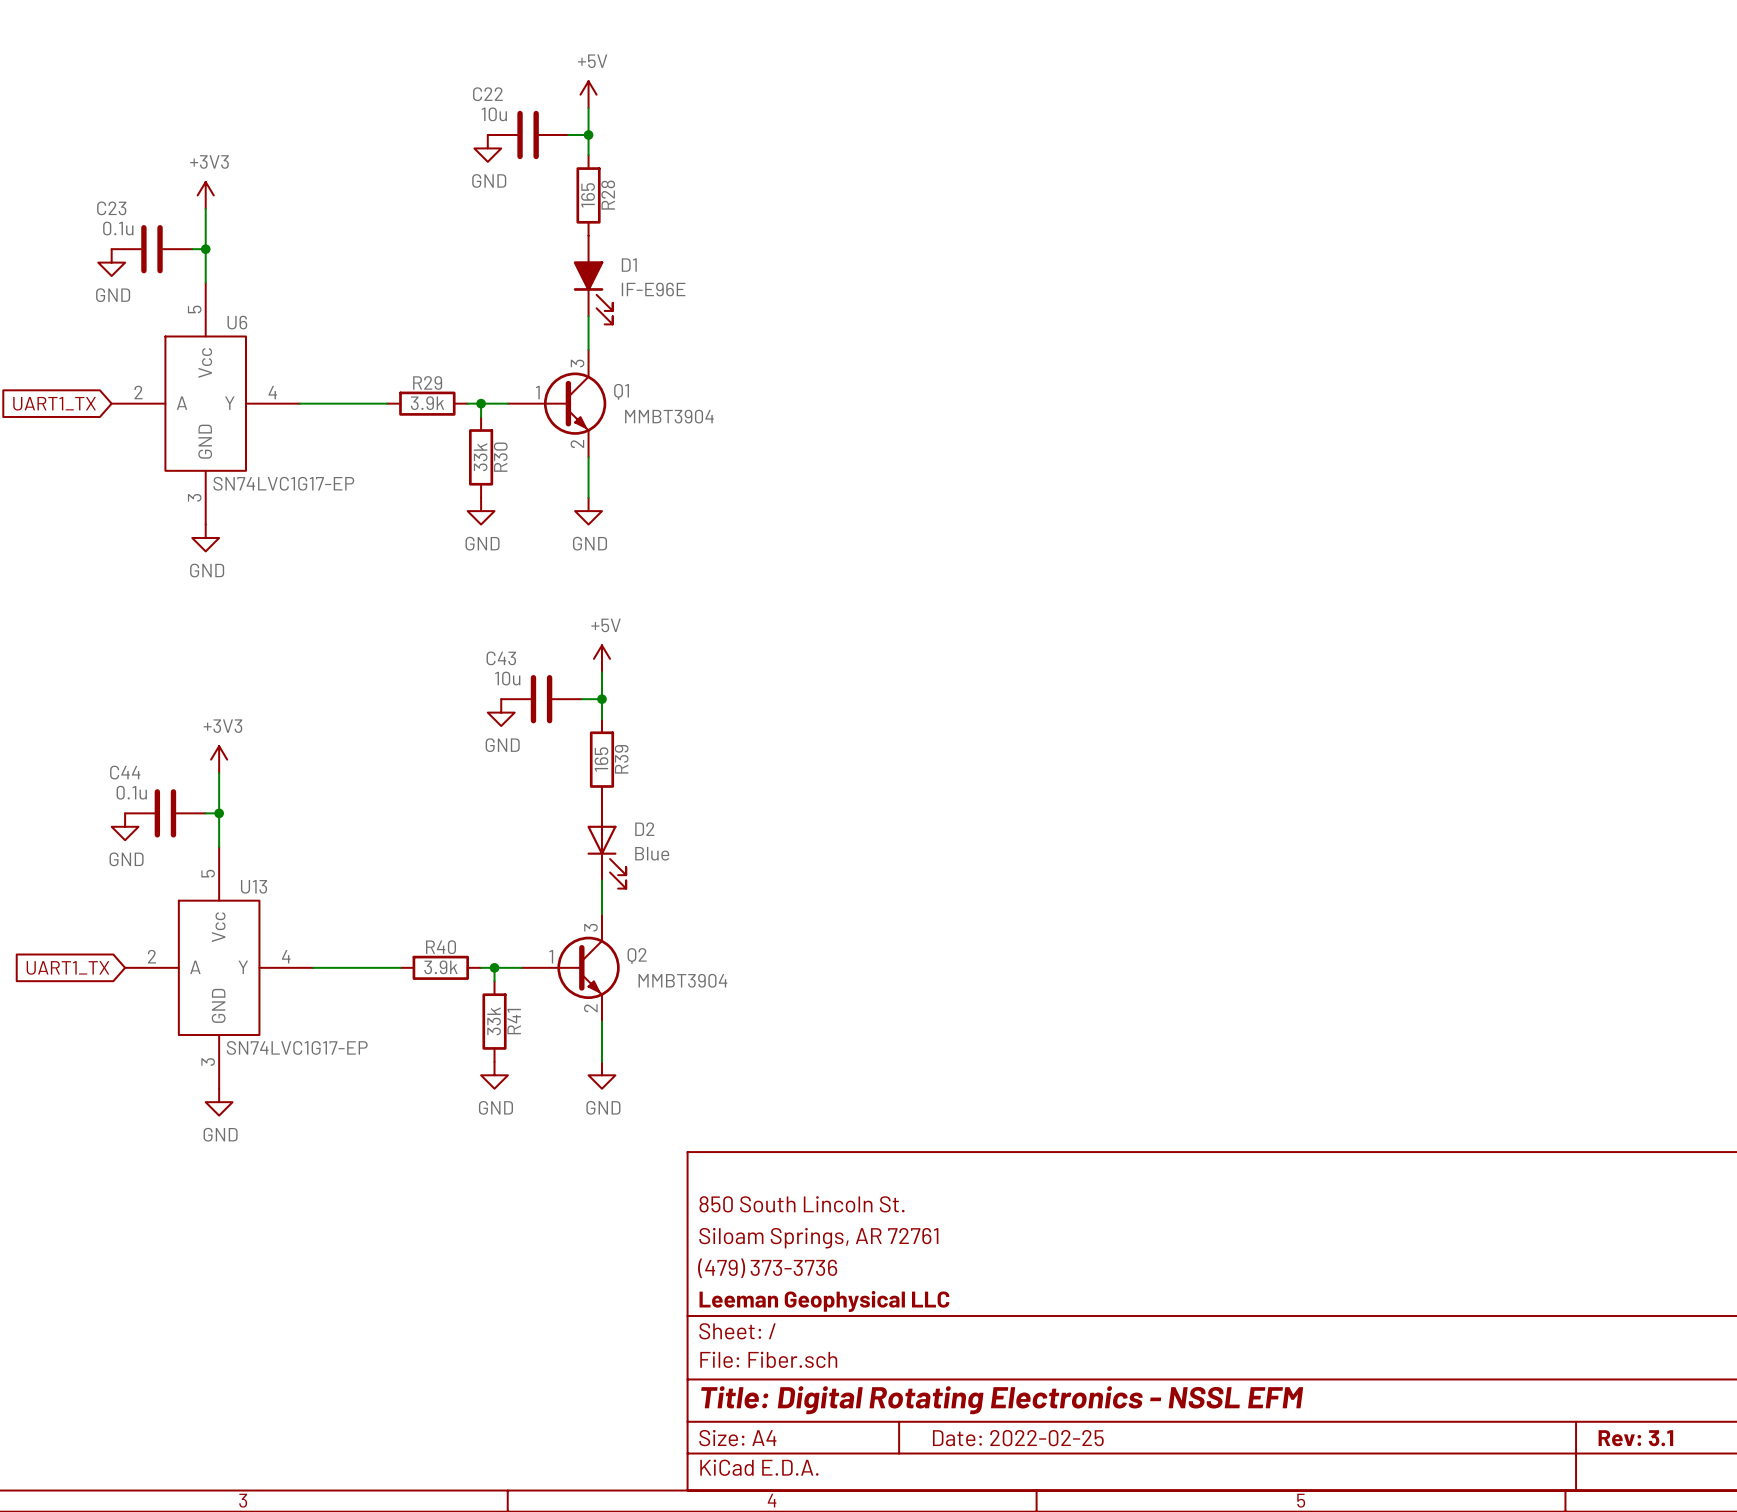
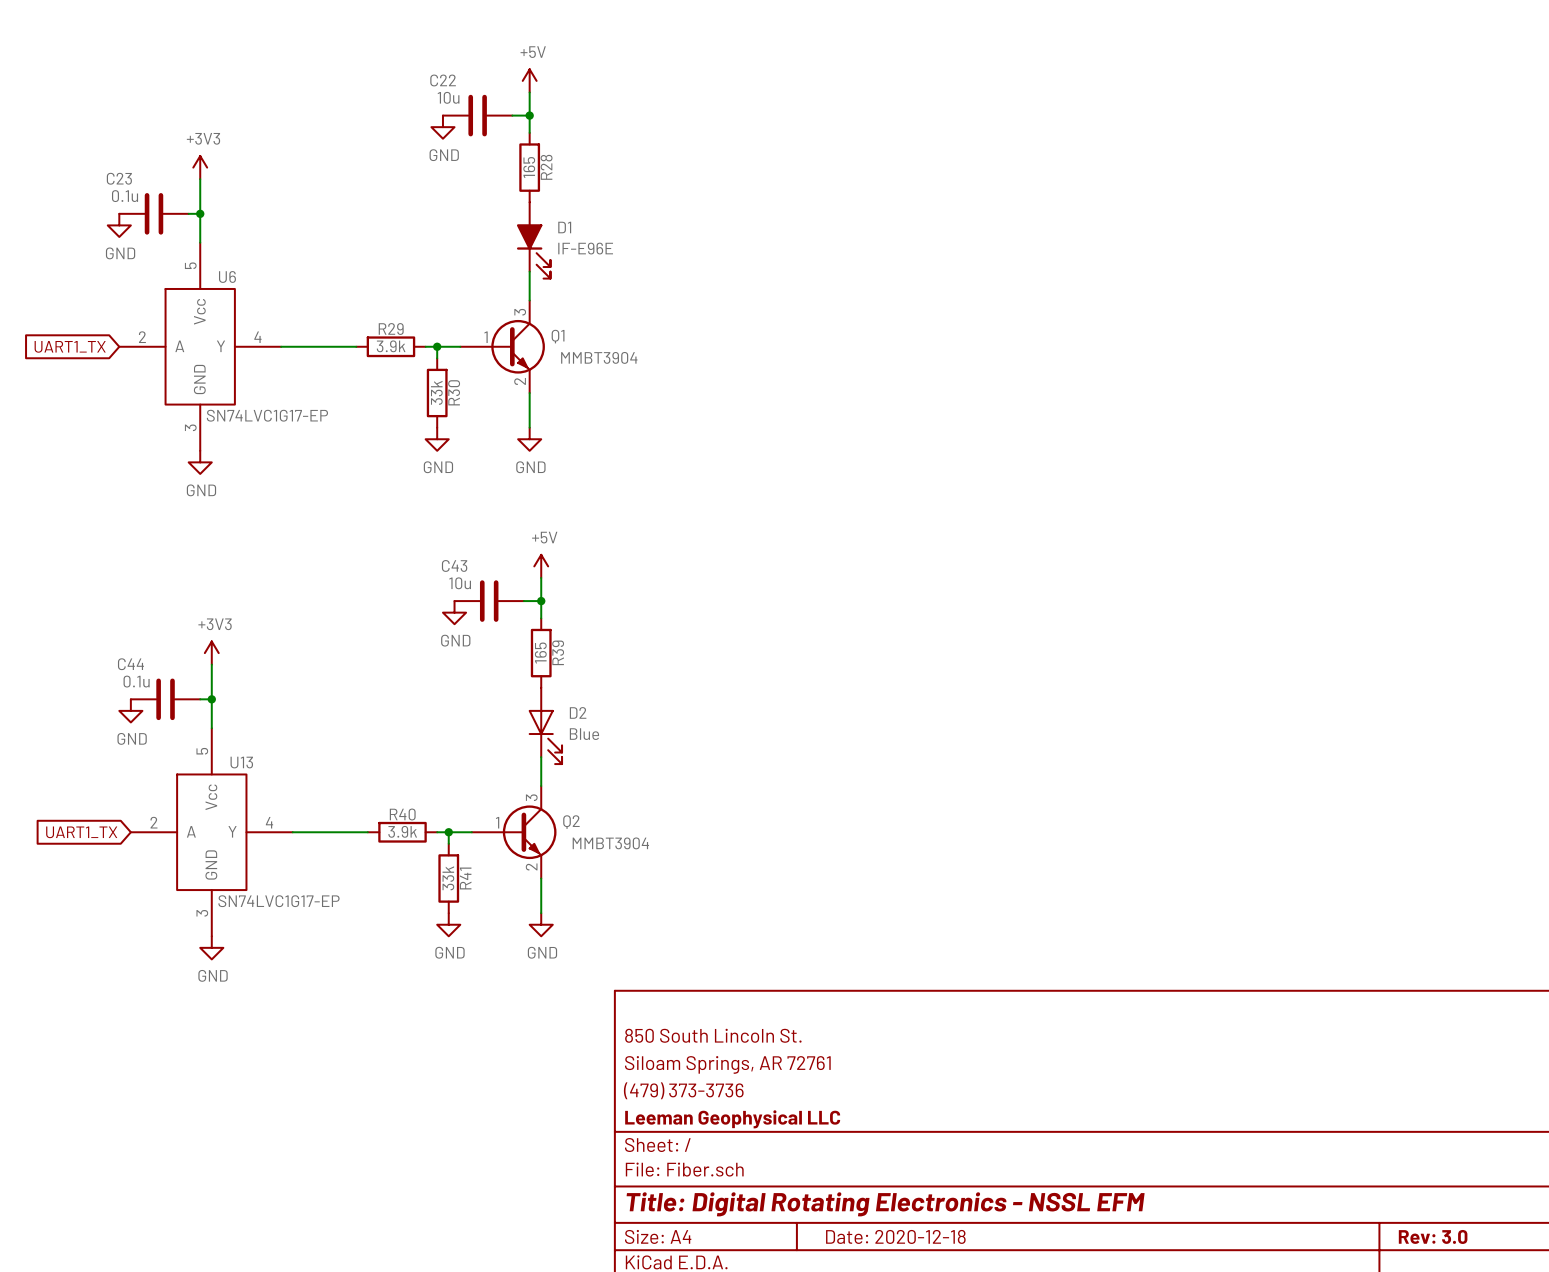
title block: Date: 2022-02-25 (1018, 1438) -> Date: 2020-12-18 (895, 1236)
title block: Rev: 3.1 (1635, 1438) -> Rev: 3.0 (1433, 1236)

